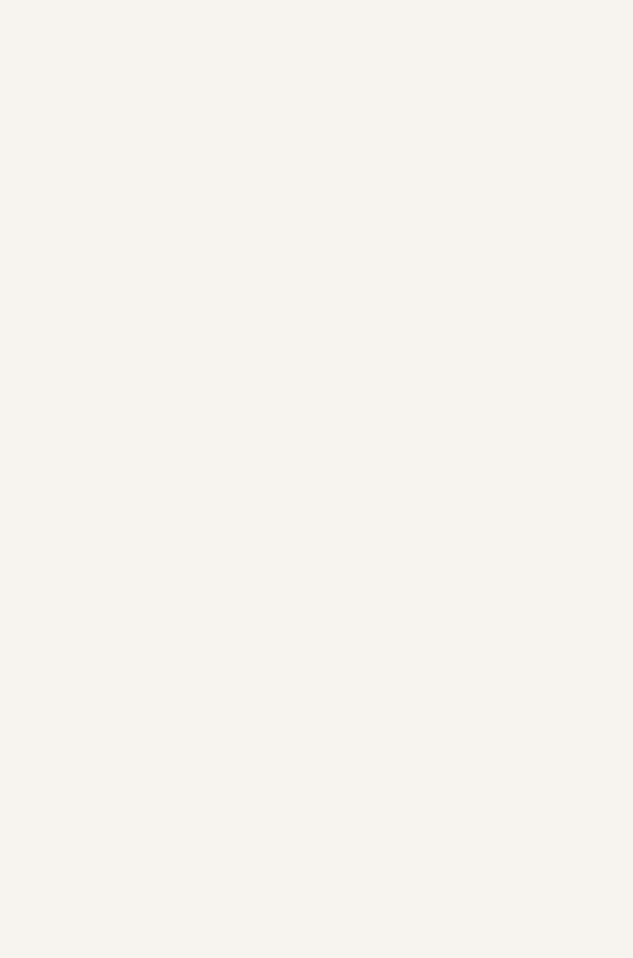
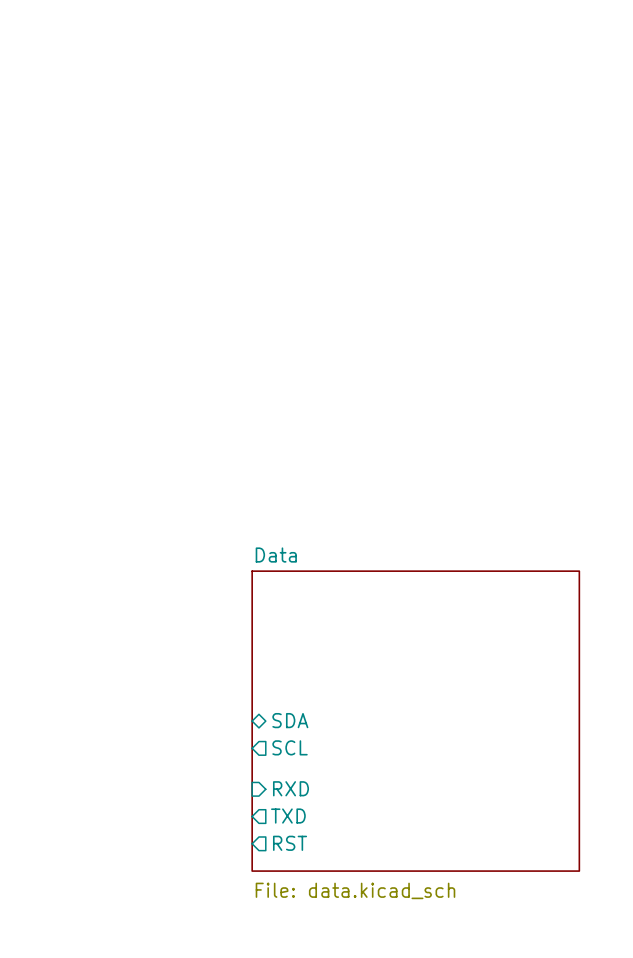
sheet pin: none -> SDA (290, 720)
sheet Data: none -> File: data.kicad_sch (415, 721)
sheet pin: none -> SCL (290, 747)
sheet pin: none -> RXD (290, 788)
sheet pin: none -> TXD (288, 816)
sheet pin: none -> RST (290, 843)

